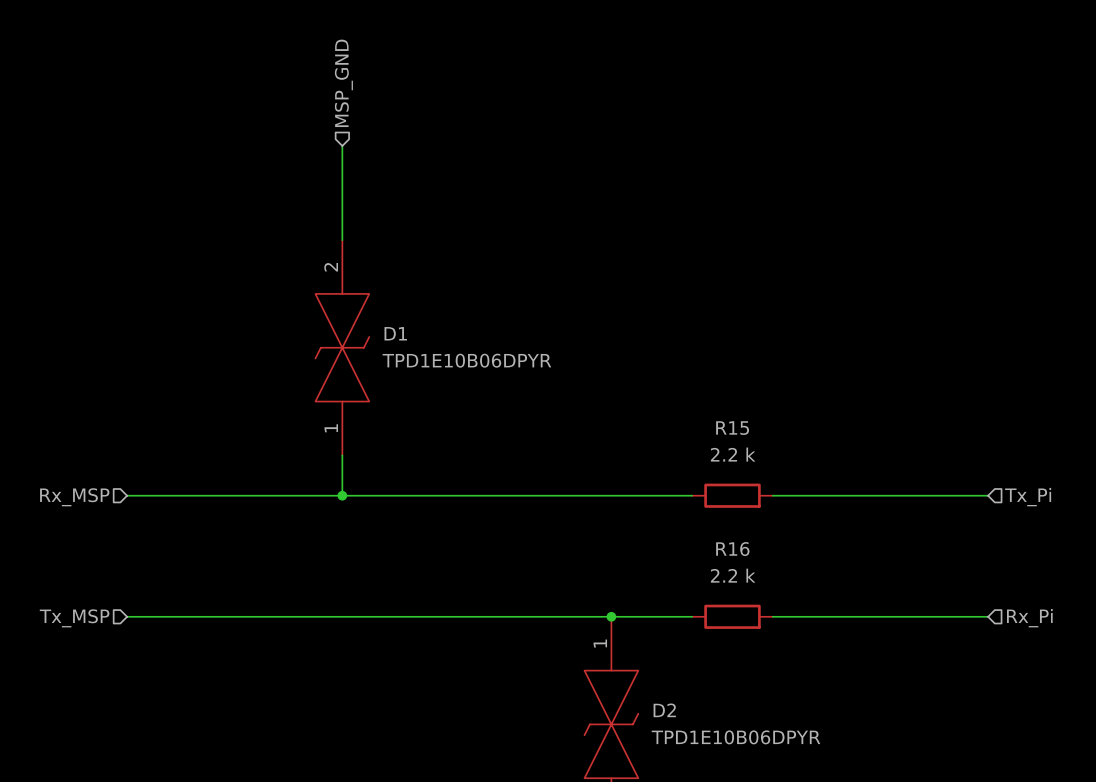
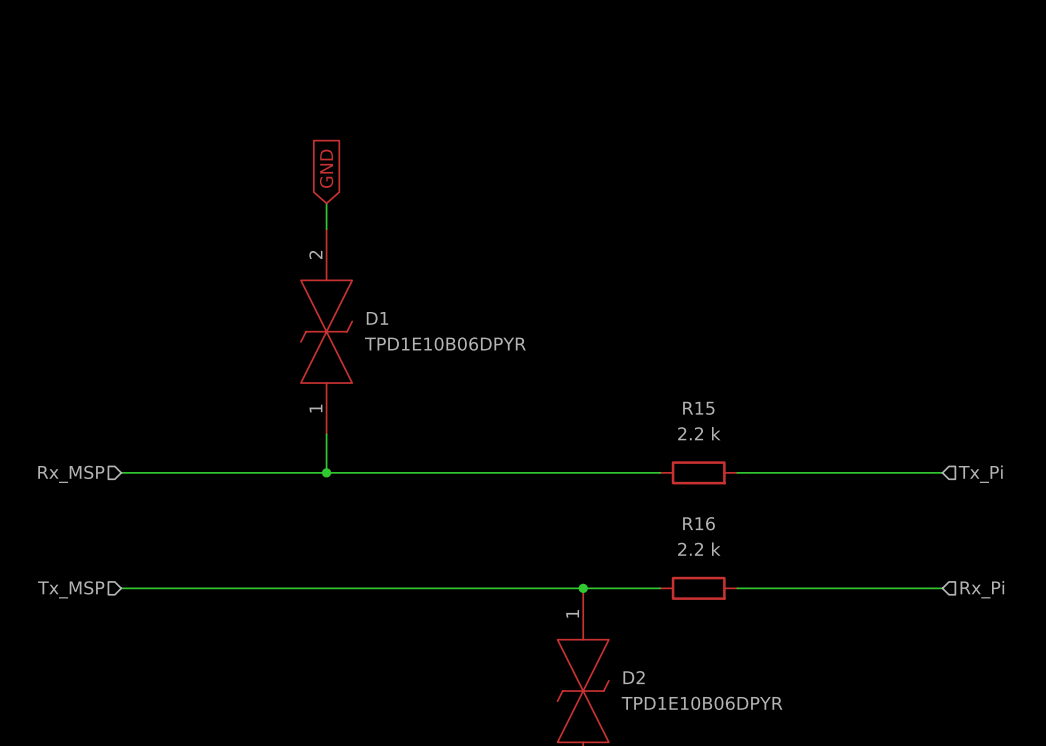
hierarchical label: MSP_GND (343, 83) -> none
wire: (342, 145) (342, 213) -> none
global label: none -> GND (326, 168)

